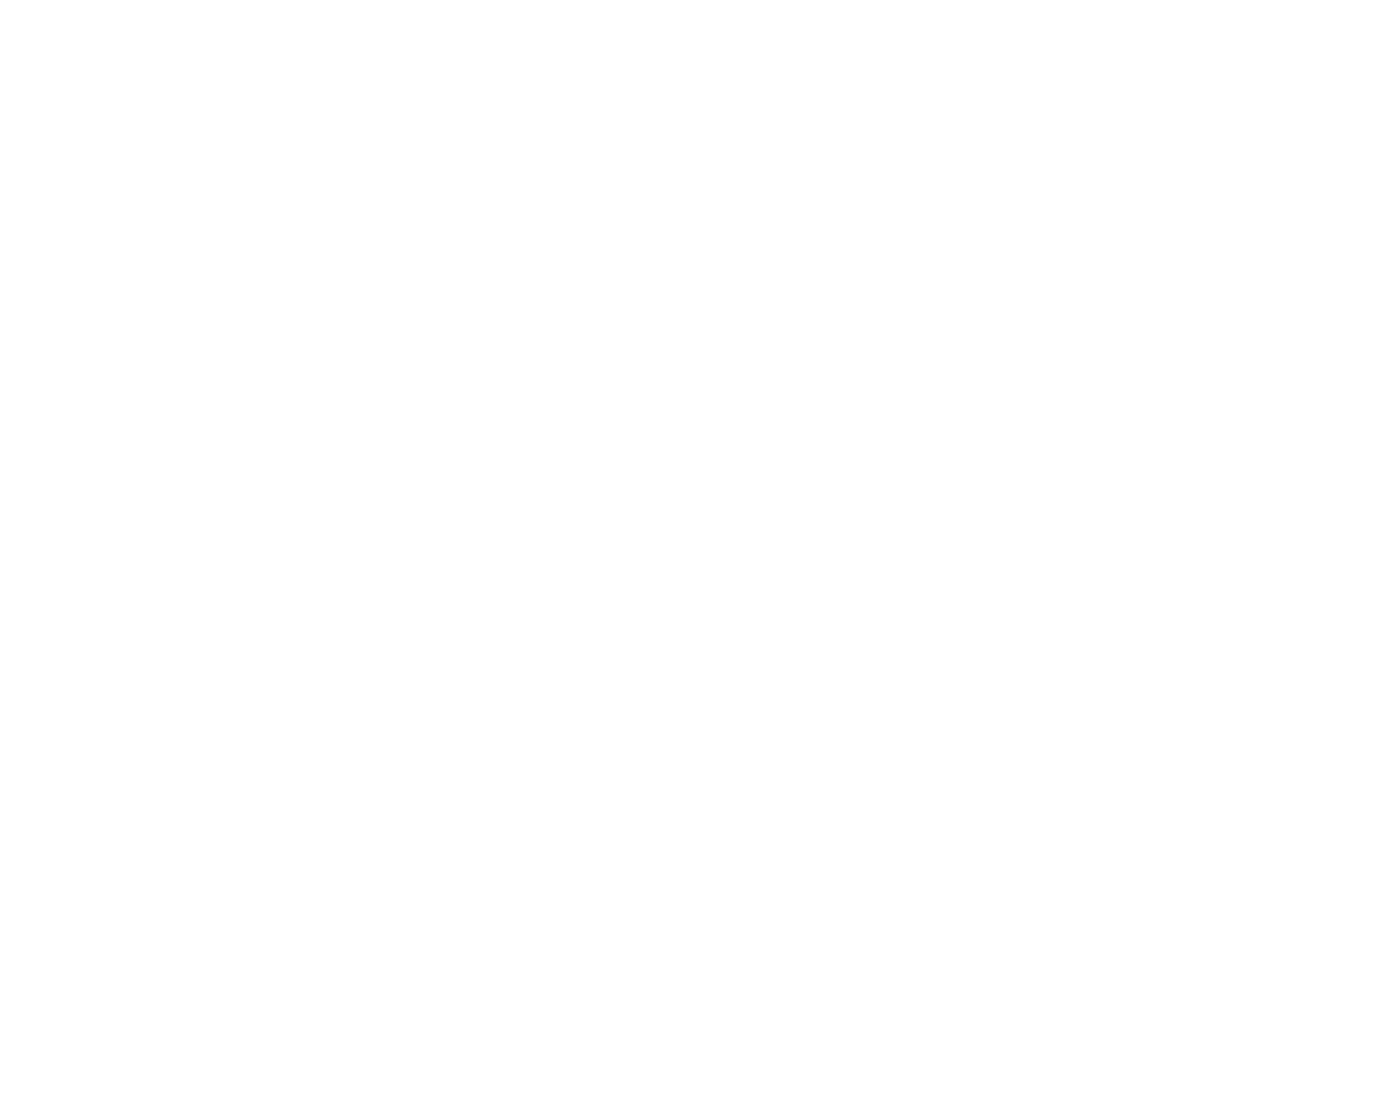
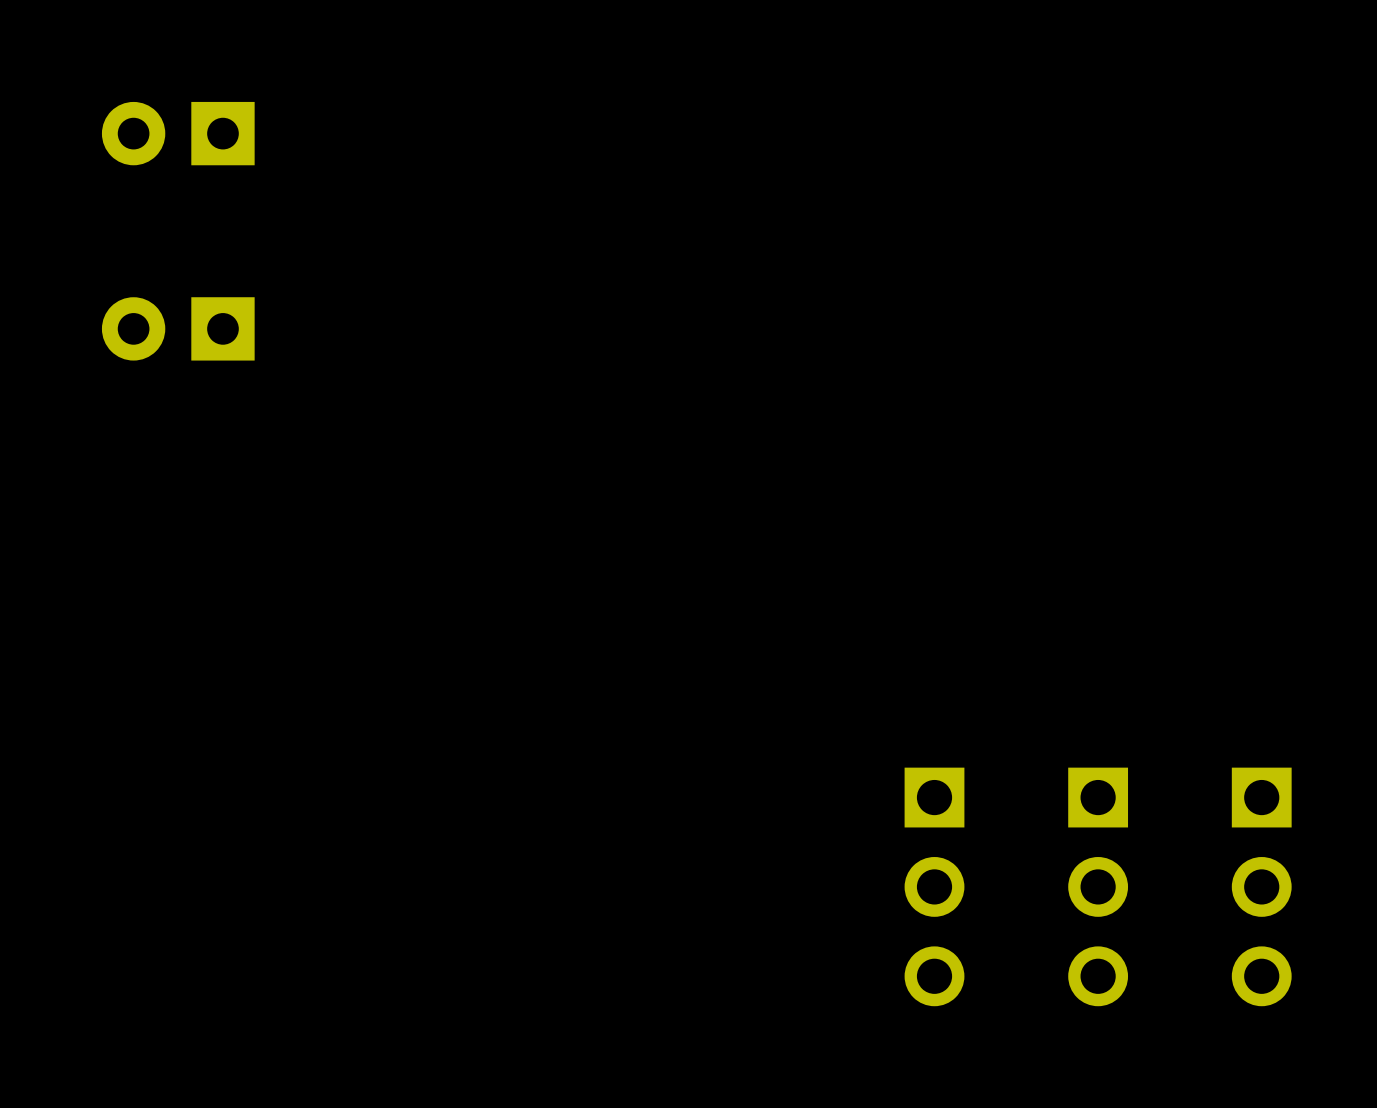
part: none -> (178, 133)
part: none -> (178, 328)
part: none -> (934, 886)
part: none -> (1098, 886)
part: none -> (1261, 886)

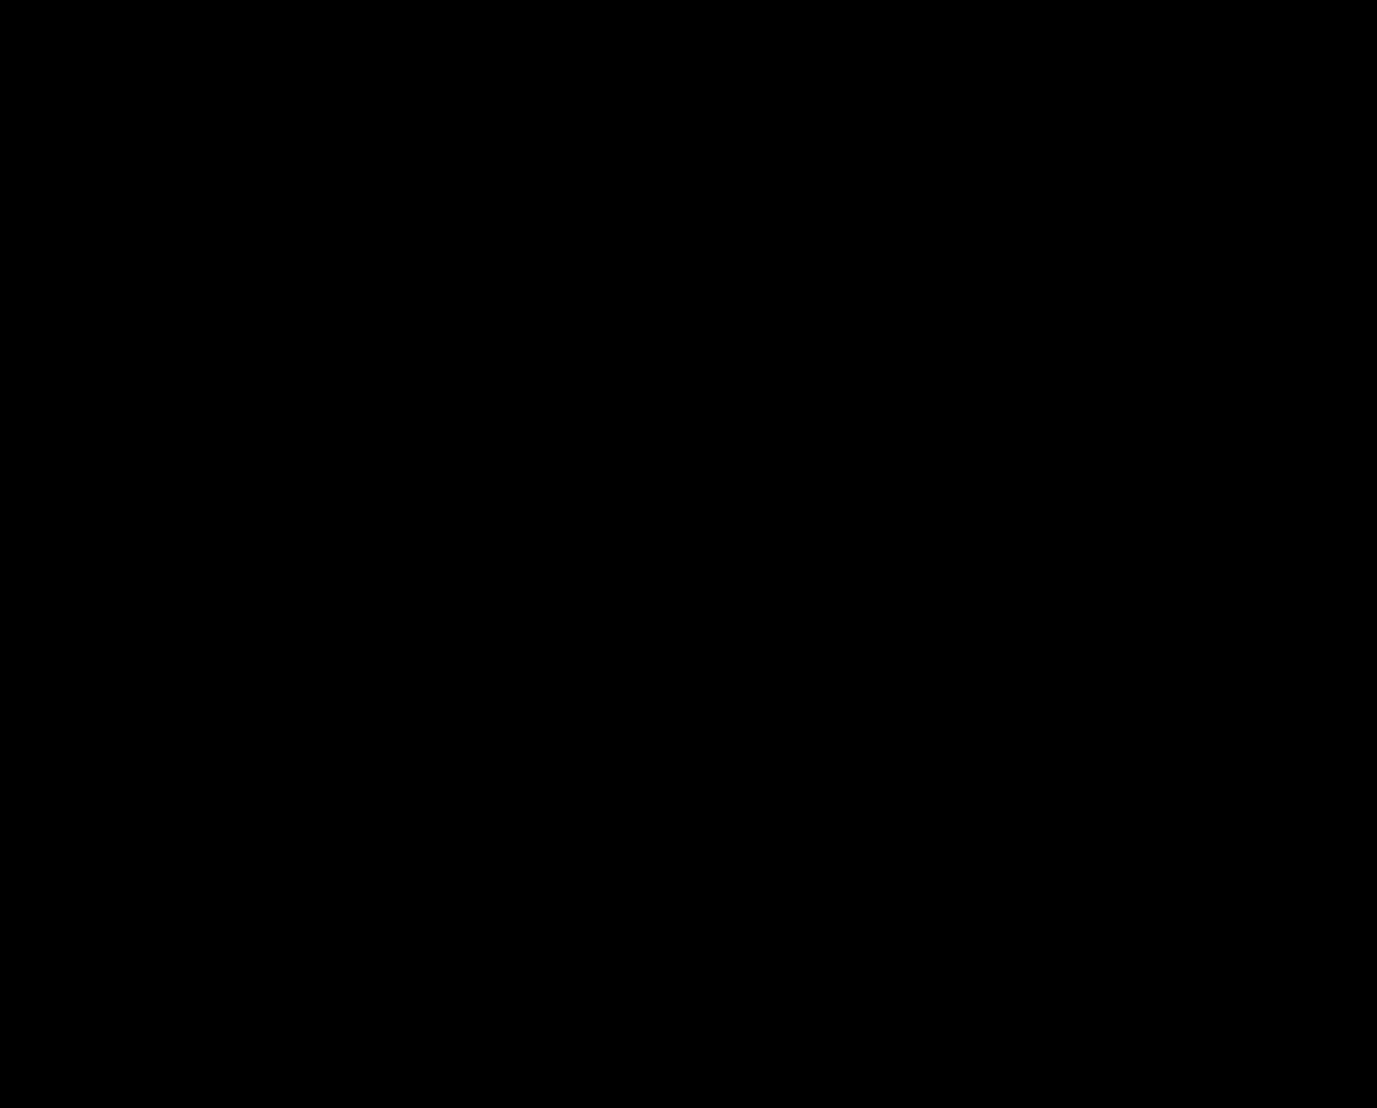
part: (178, 133) -> none
part: (178, 328) -> none
part: (934, 886) -> none
part: (1098, 886) -> none
part: (1261, 886) -> none

